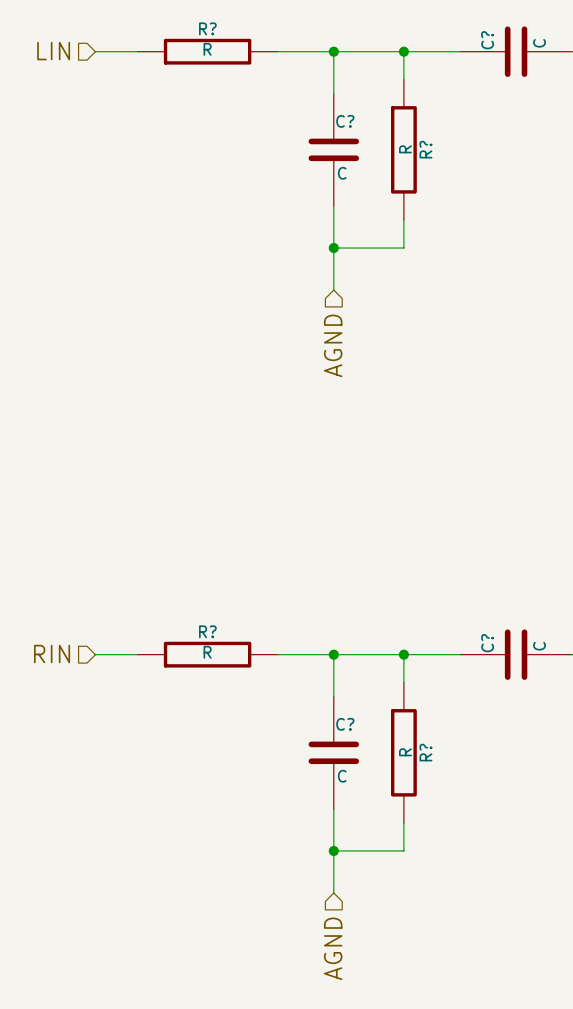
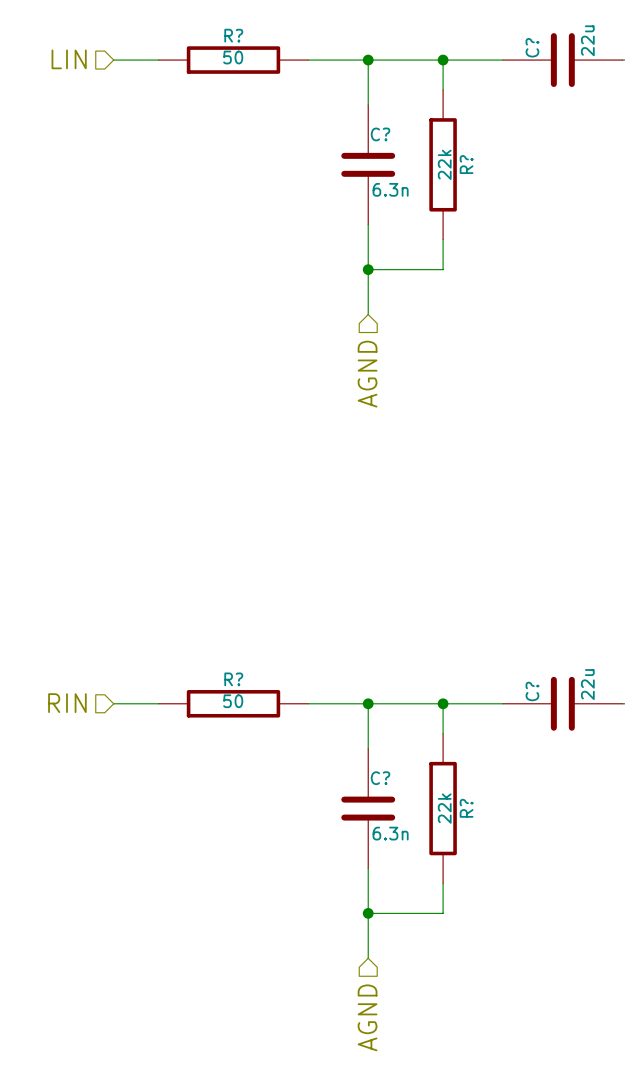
C? value: C (539, 43) -> 22u (587, 40)
R? value: R (207, 49) -> 50 (233, 57)
R? value: R (405, 149) -> 22k (444, 164)
C? value: C (342, 173) -> 6.3n (390, 189)
C? value: C (539, 646) -> 22u (587, 684)
R? value: R (207, 652) -> 50 (233, 701)
R? value: R (405, 752) -> 22k (444, 808)
C? value: C (342, 776) -> 6.3n (390, 833)

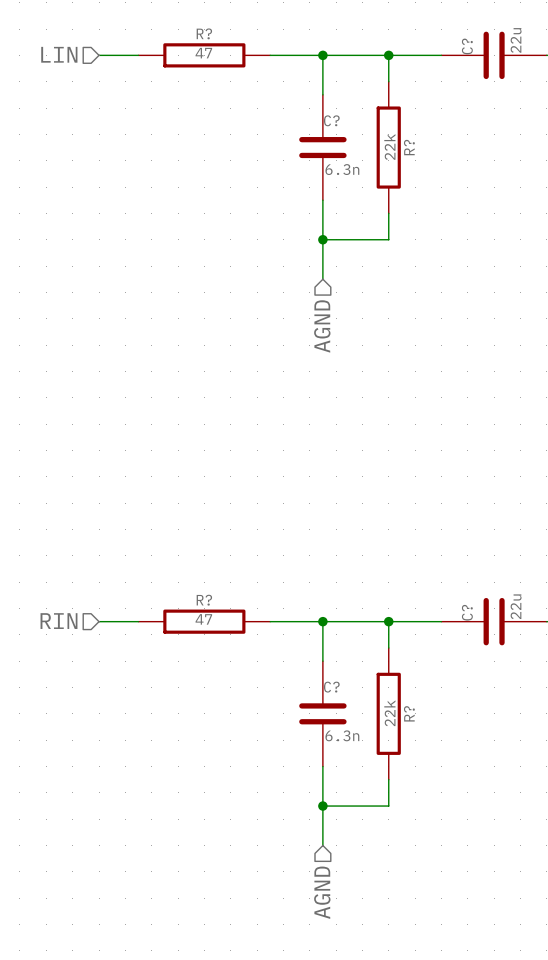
R? value: 50 (233, 57) -> 47 (203, 53)
R? value: 50 (233, 701) -> 47 (203, 619)

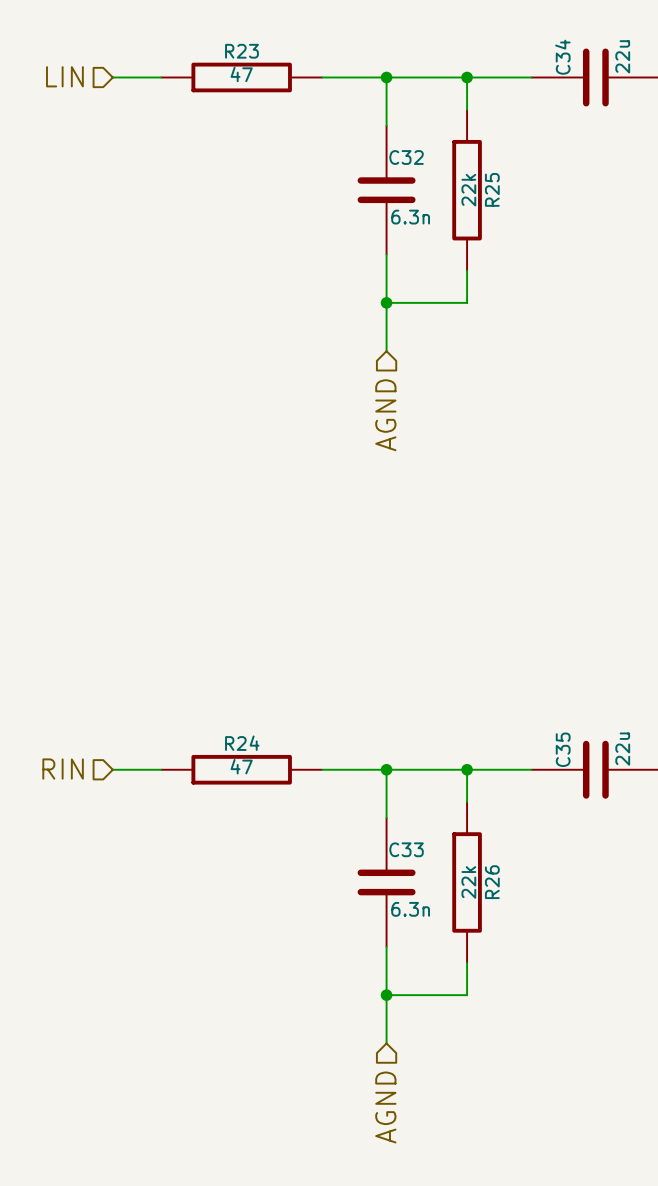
R? name: R? (204, 33) -> R23 (241, 51)
C? name: C? (467, 46) -> C34 (562, 57)
C? name: C? (331, 120) -> C32 (406, 157)
R? name: R? (409, 147) -> R25 (492, 189)
R? name: R? (204, 600) -> R24 (242, 743)
C? name: C? (467, 612) -> C35 (563, 749)
C? name: C? (331, 687) -> C33 (406, 849)
R? name: R? (409, 713) -> R26 (492, 882)

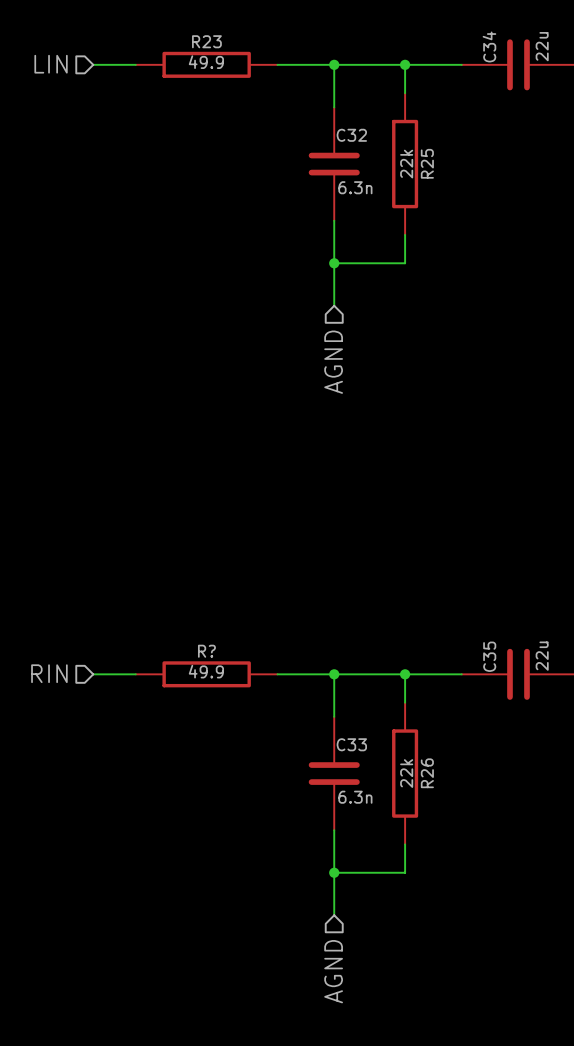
R23 value: 47 (241, 74) -> 49.9 (206, 62)
R24 name: R24 (242, 743) -> R? (206, 651)
R24 value: 47 (241, 766) -> 49.9 (206, 671)

